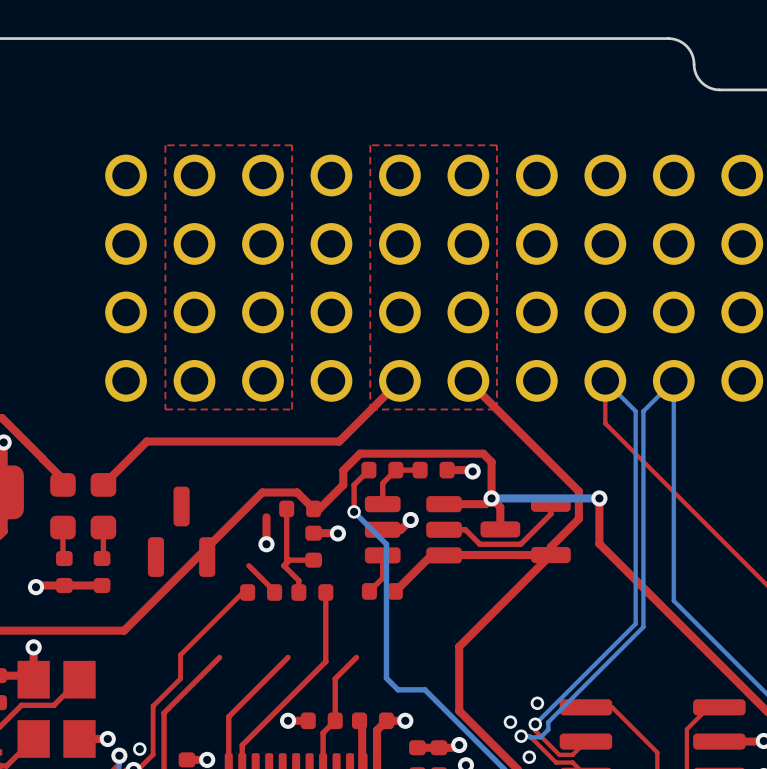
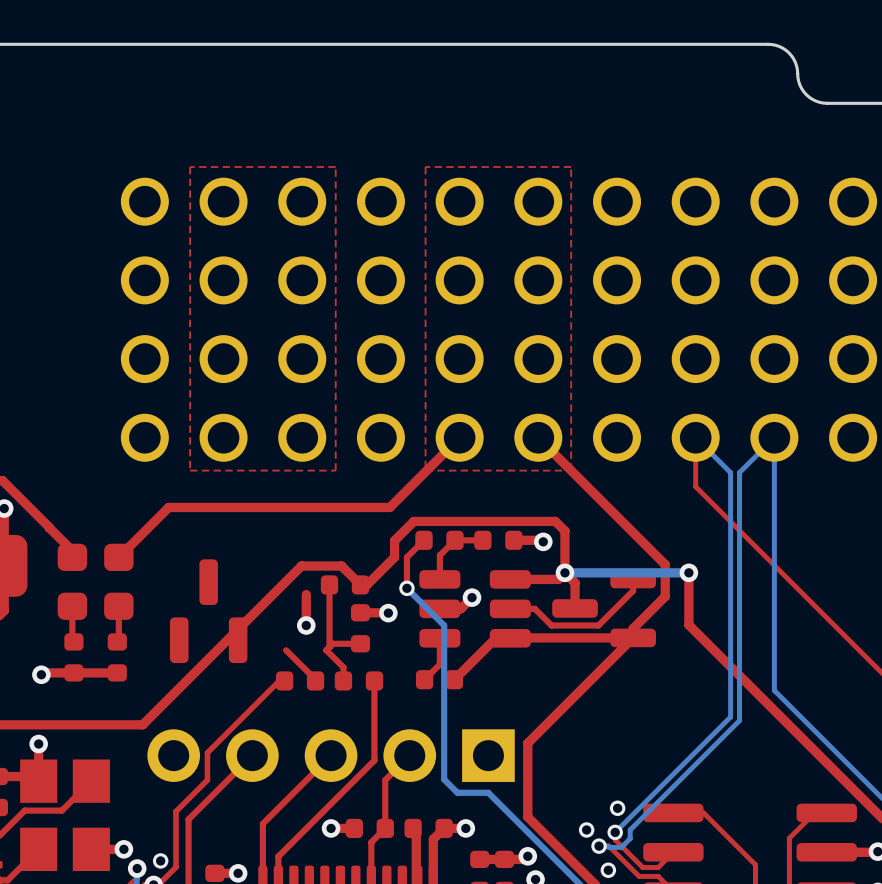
part: none -> (331, 755)

